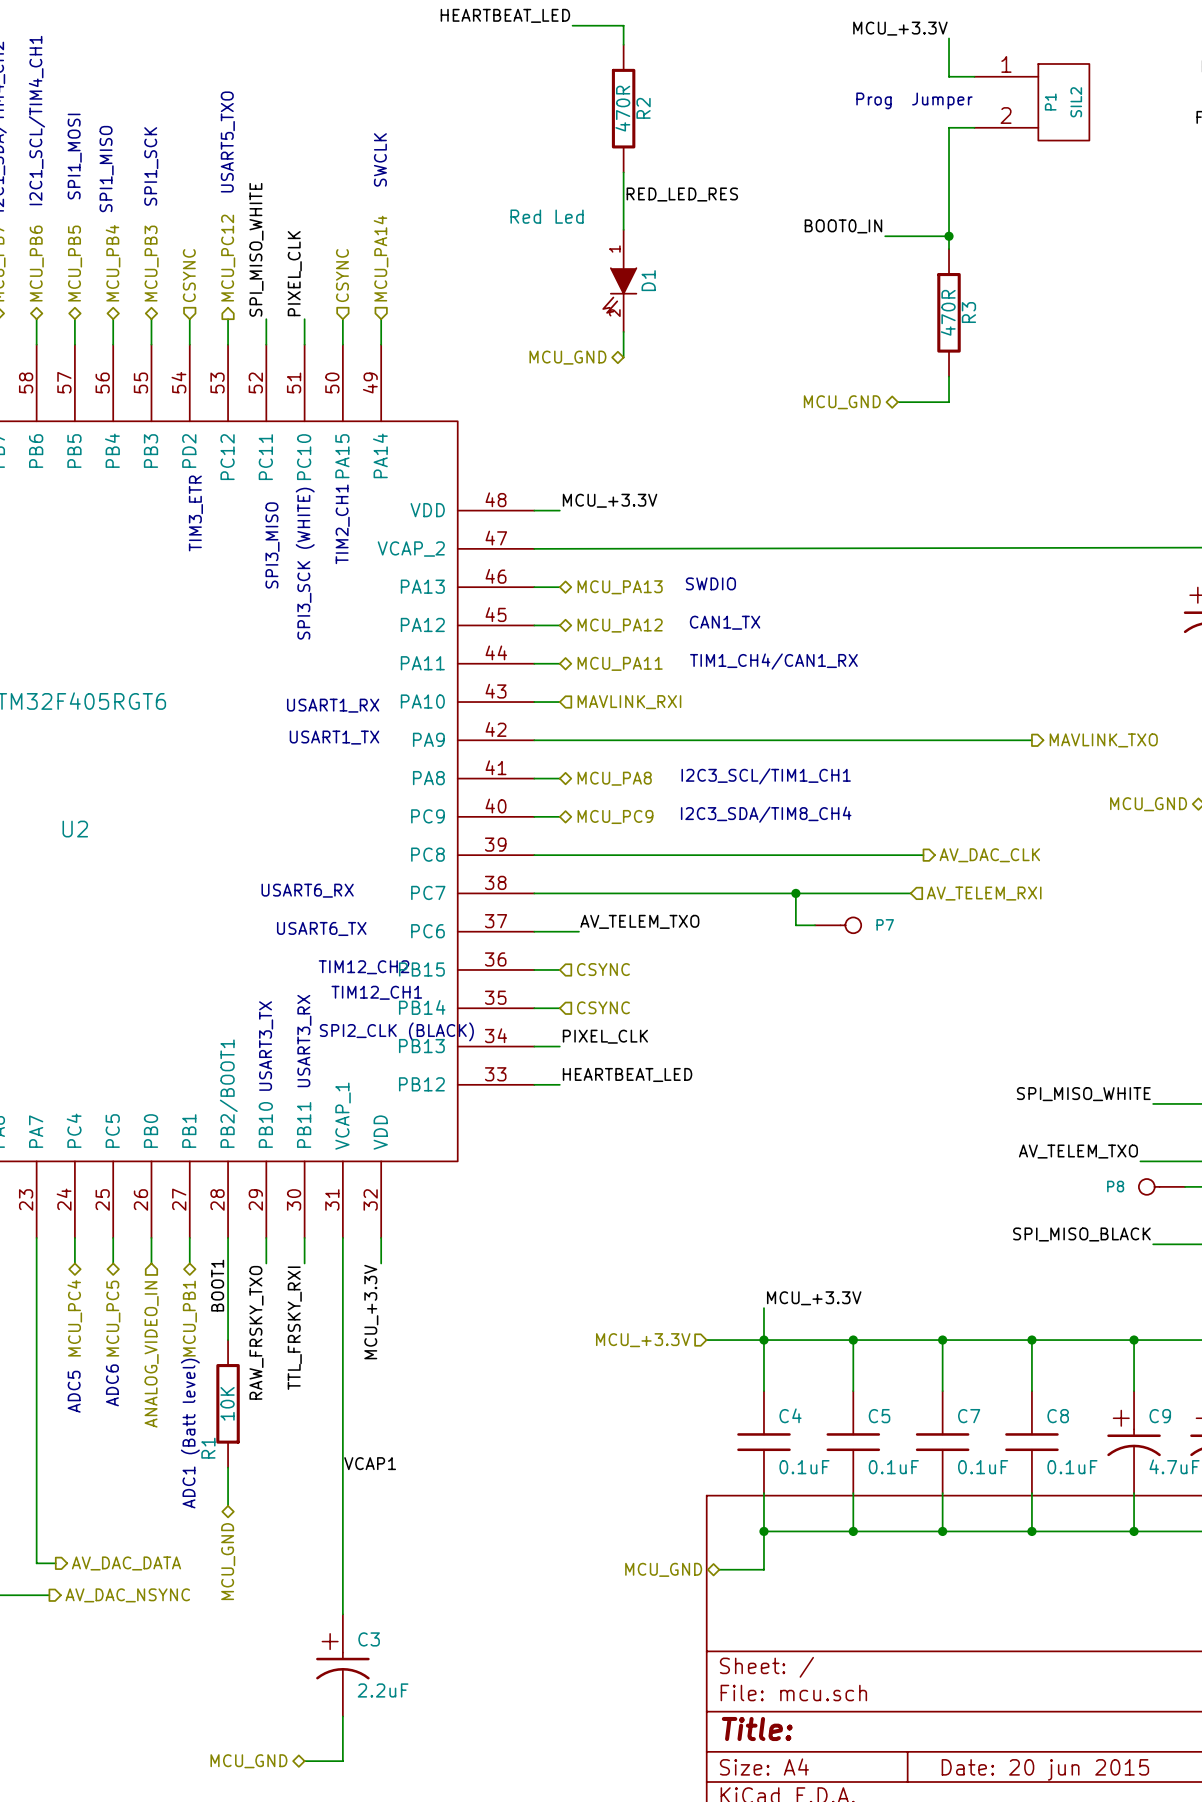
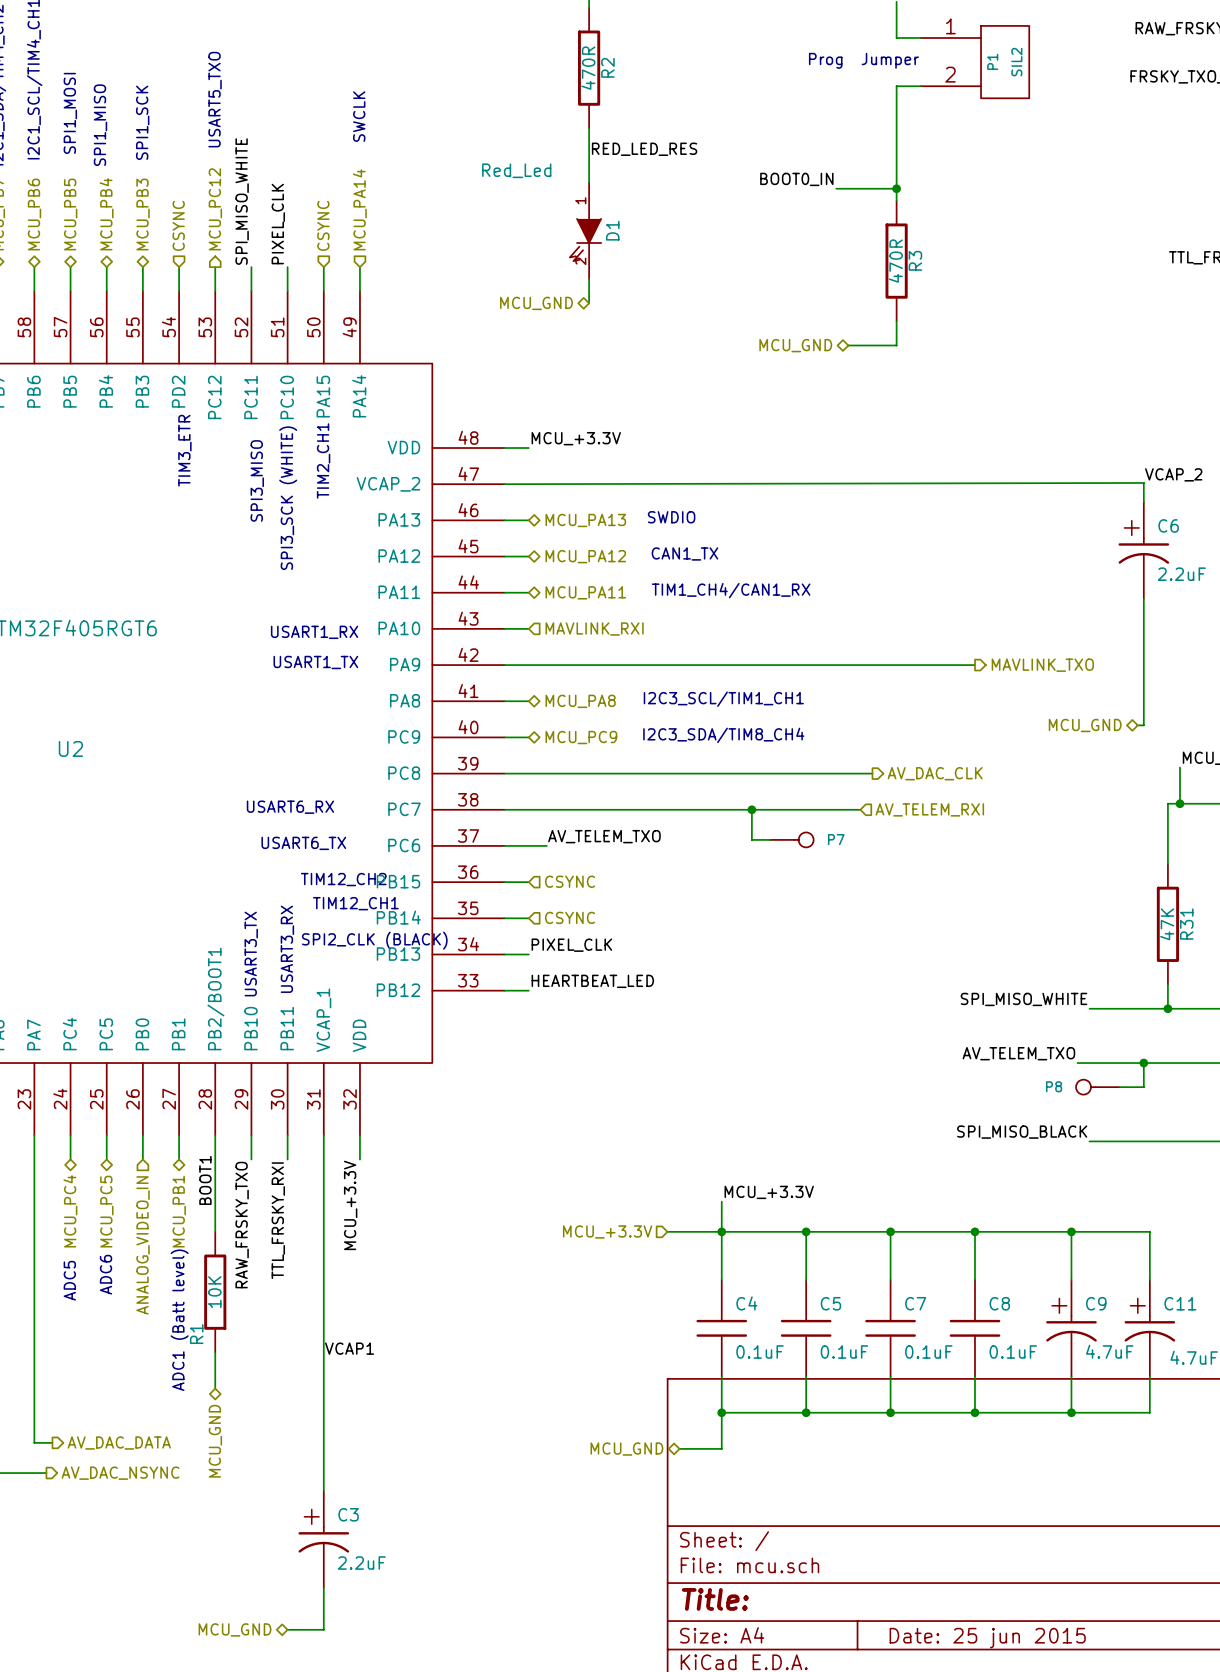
D1 value: Red Led (547, 216) -> Red_Led (516, 170)
title block: Date: 20 jun 2015 (1045, 1769) -> Date: 25 jun 2015 (987, 1638)

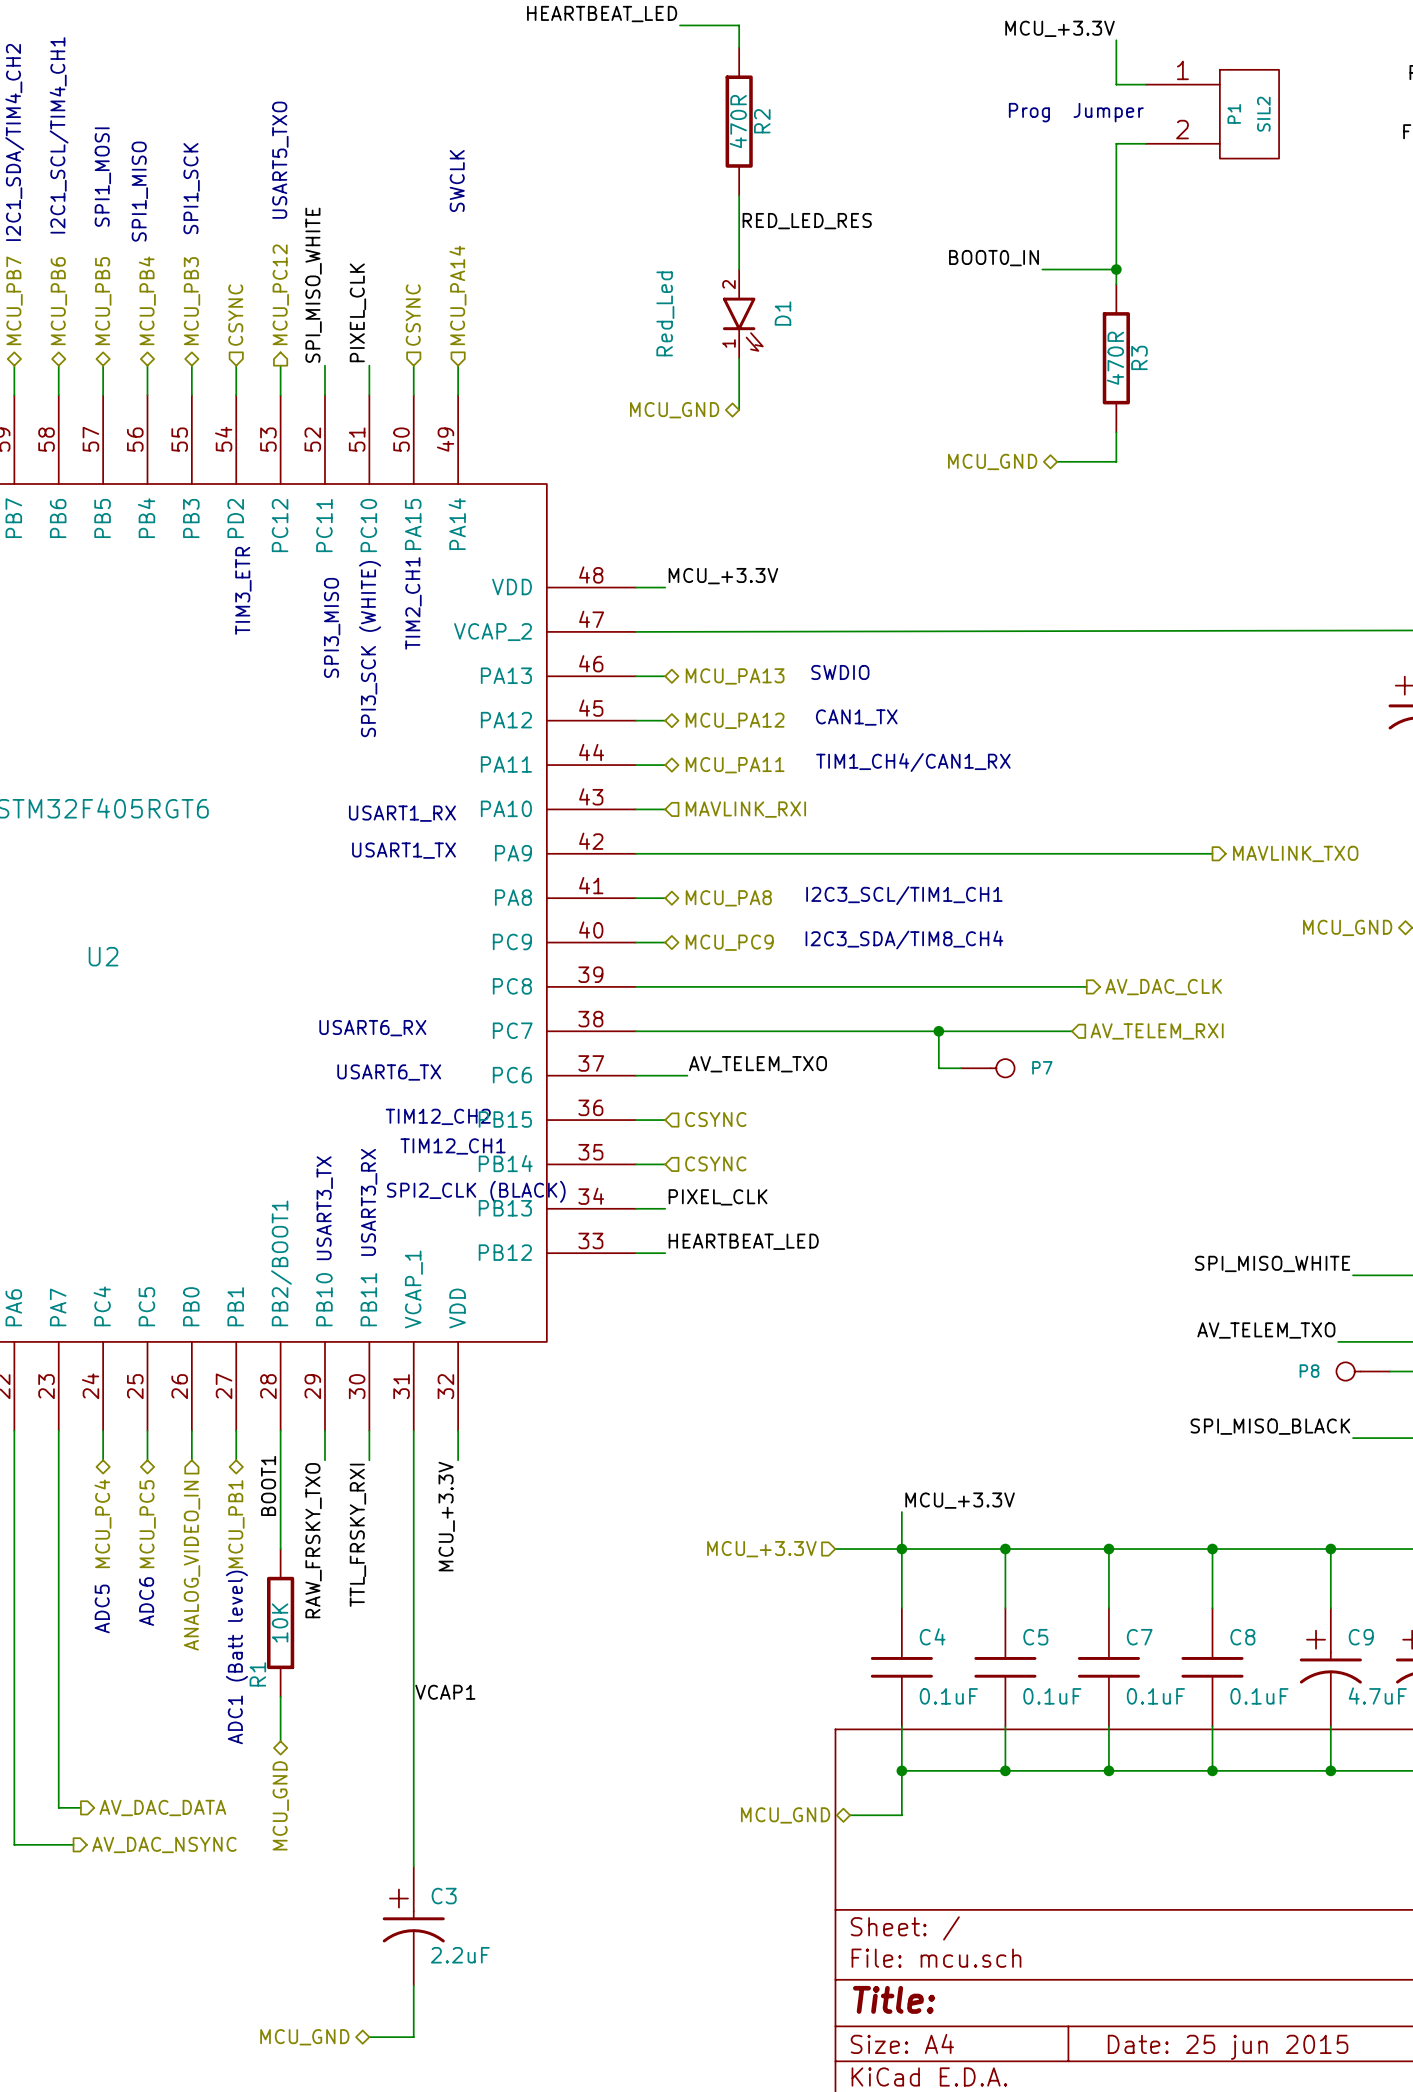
D1 value position: Red_Led (516, 170) -> Red_Led (665, 313)
D1 symbol: [569, 182, 602, 280] -> [722, 269, 763, 359]

